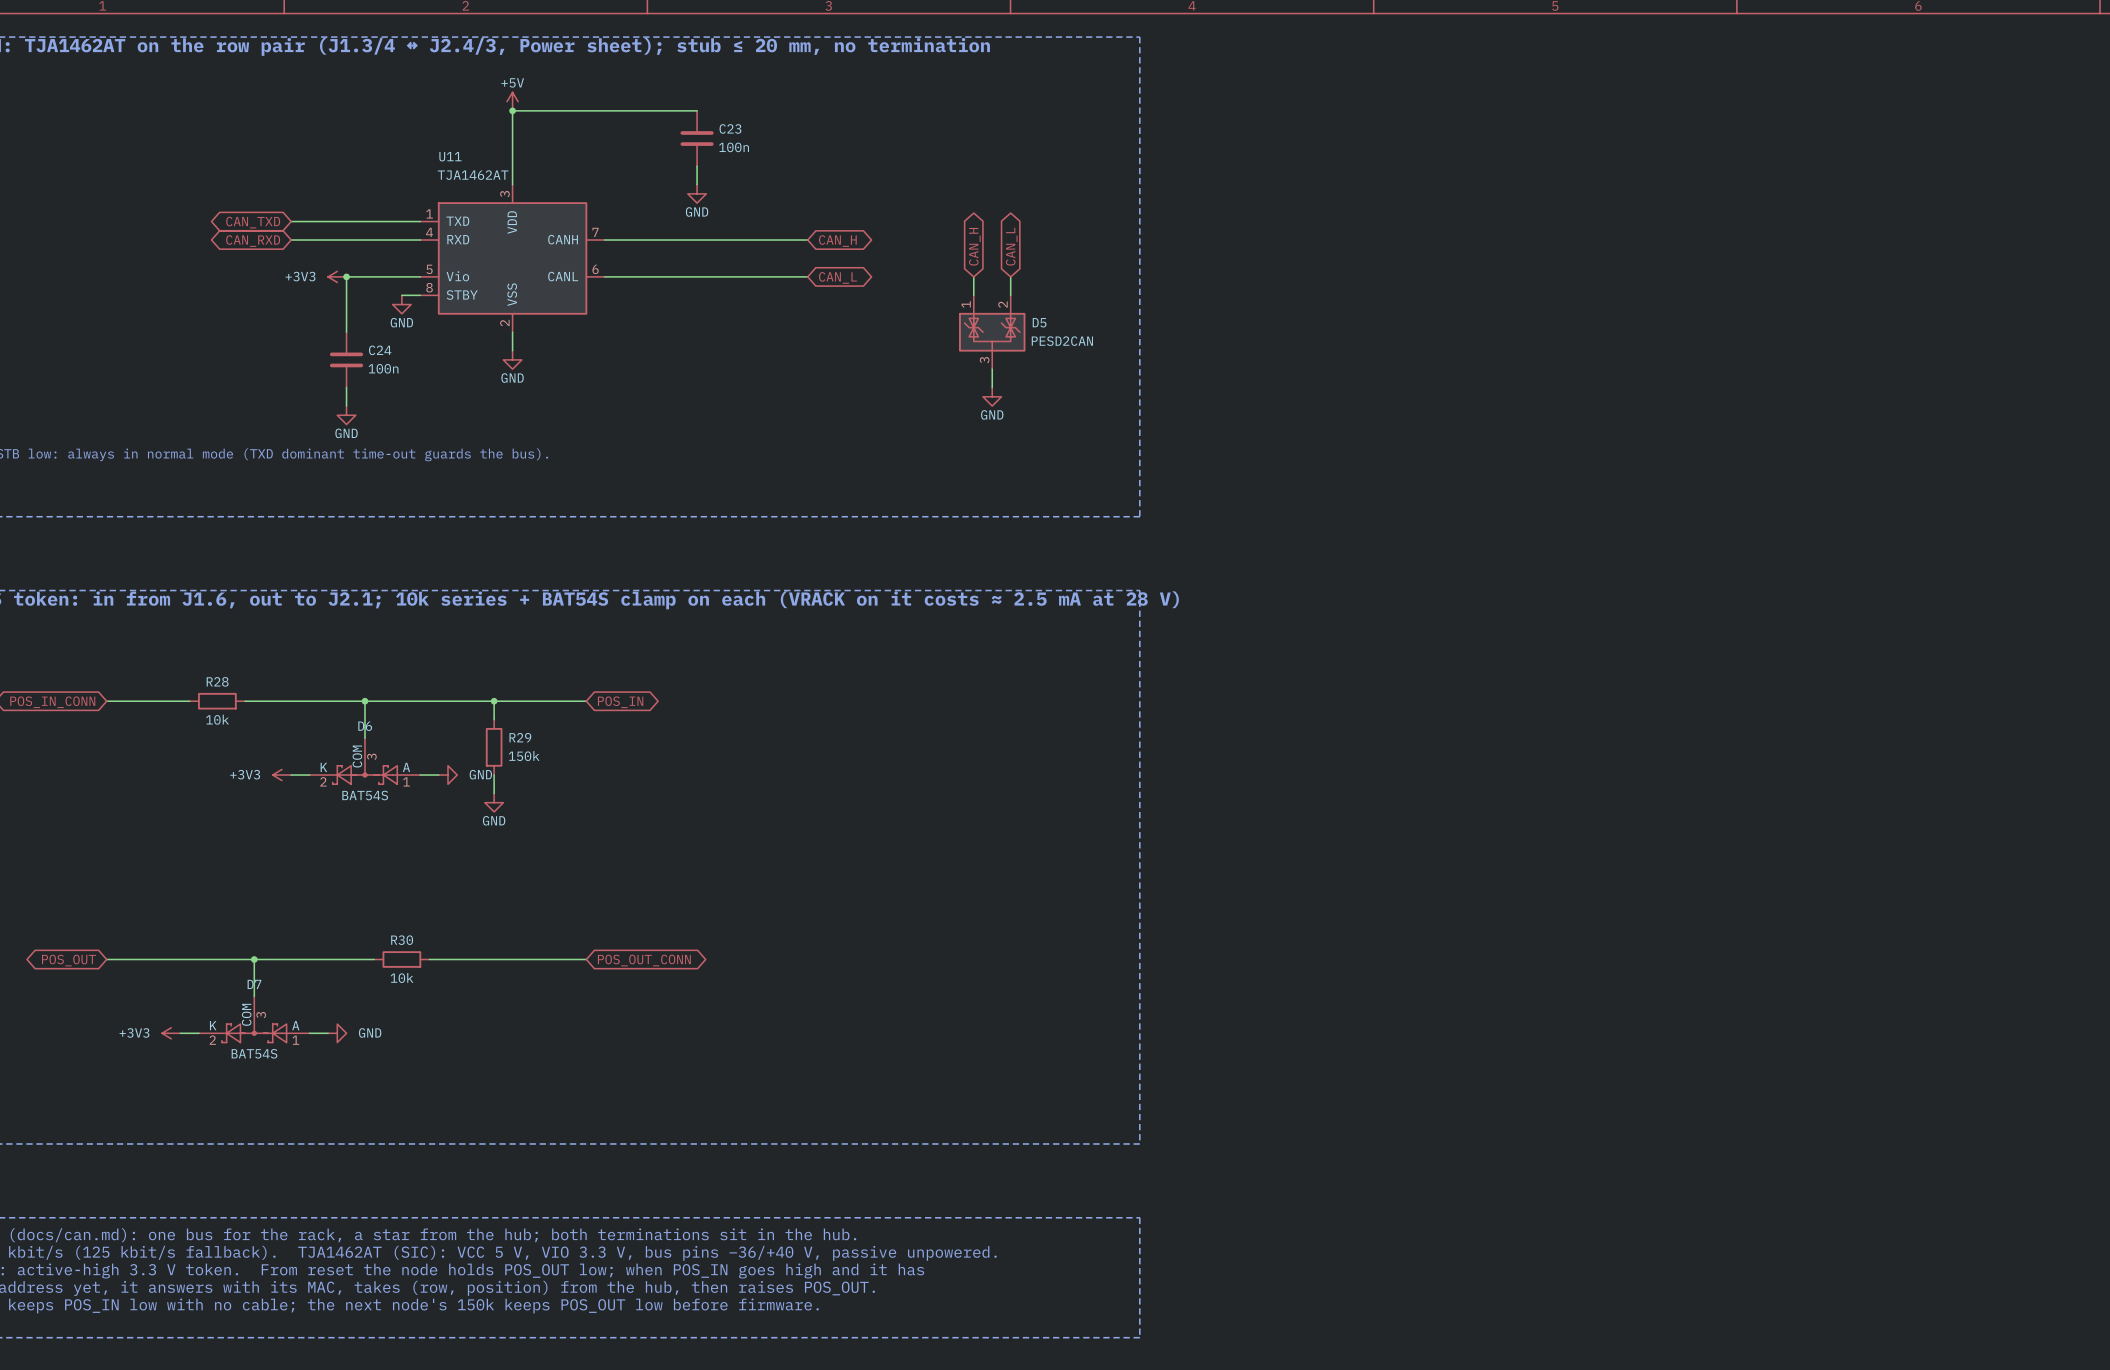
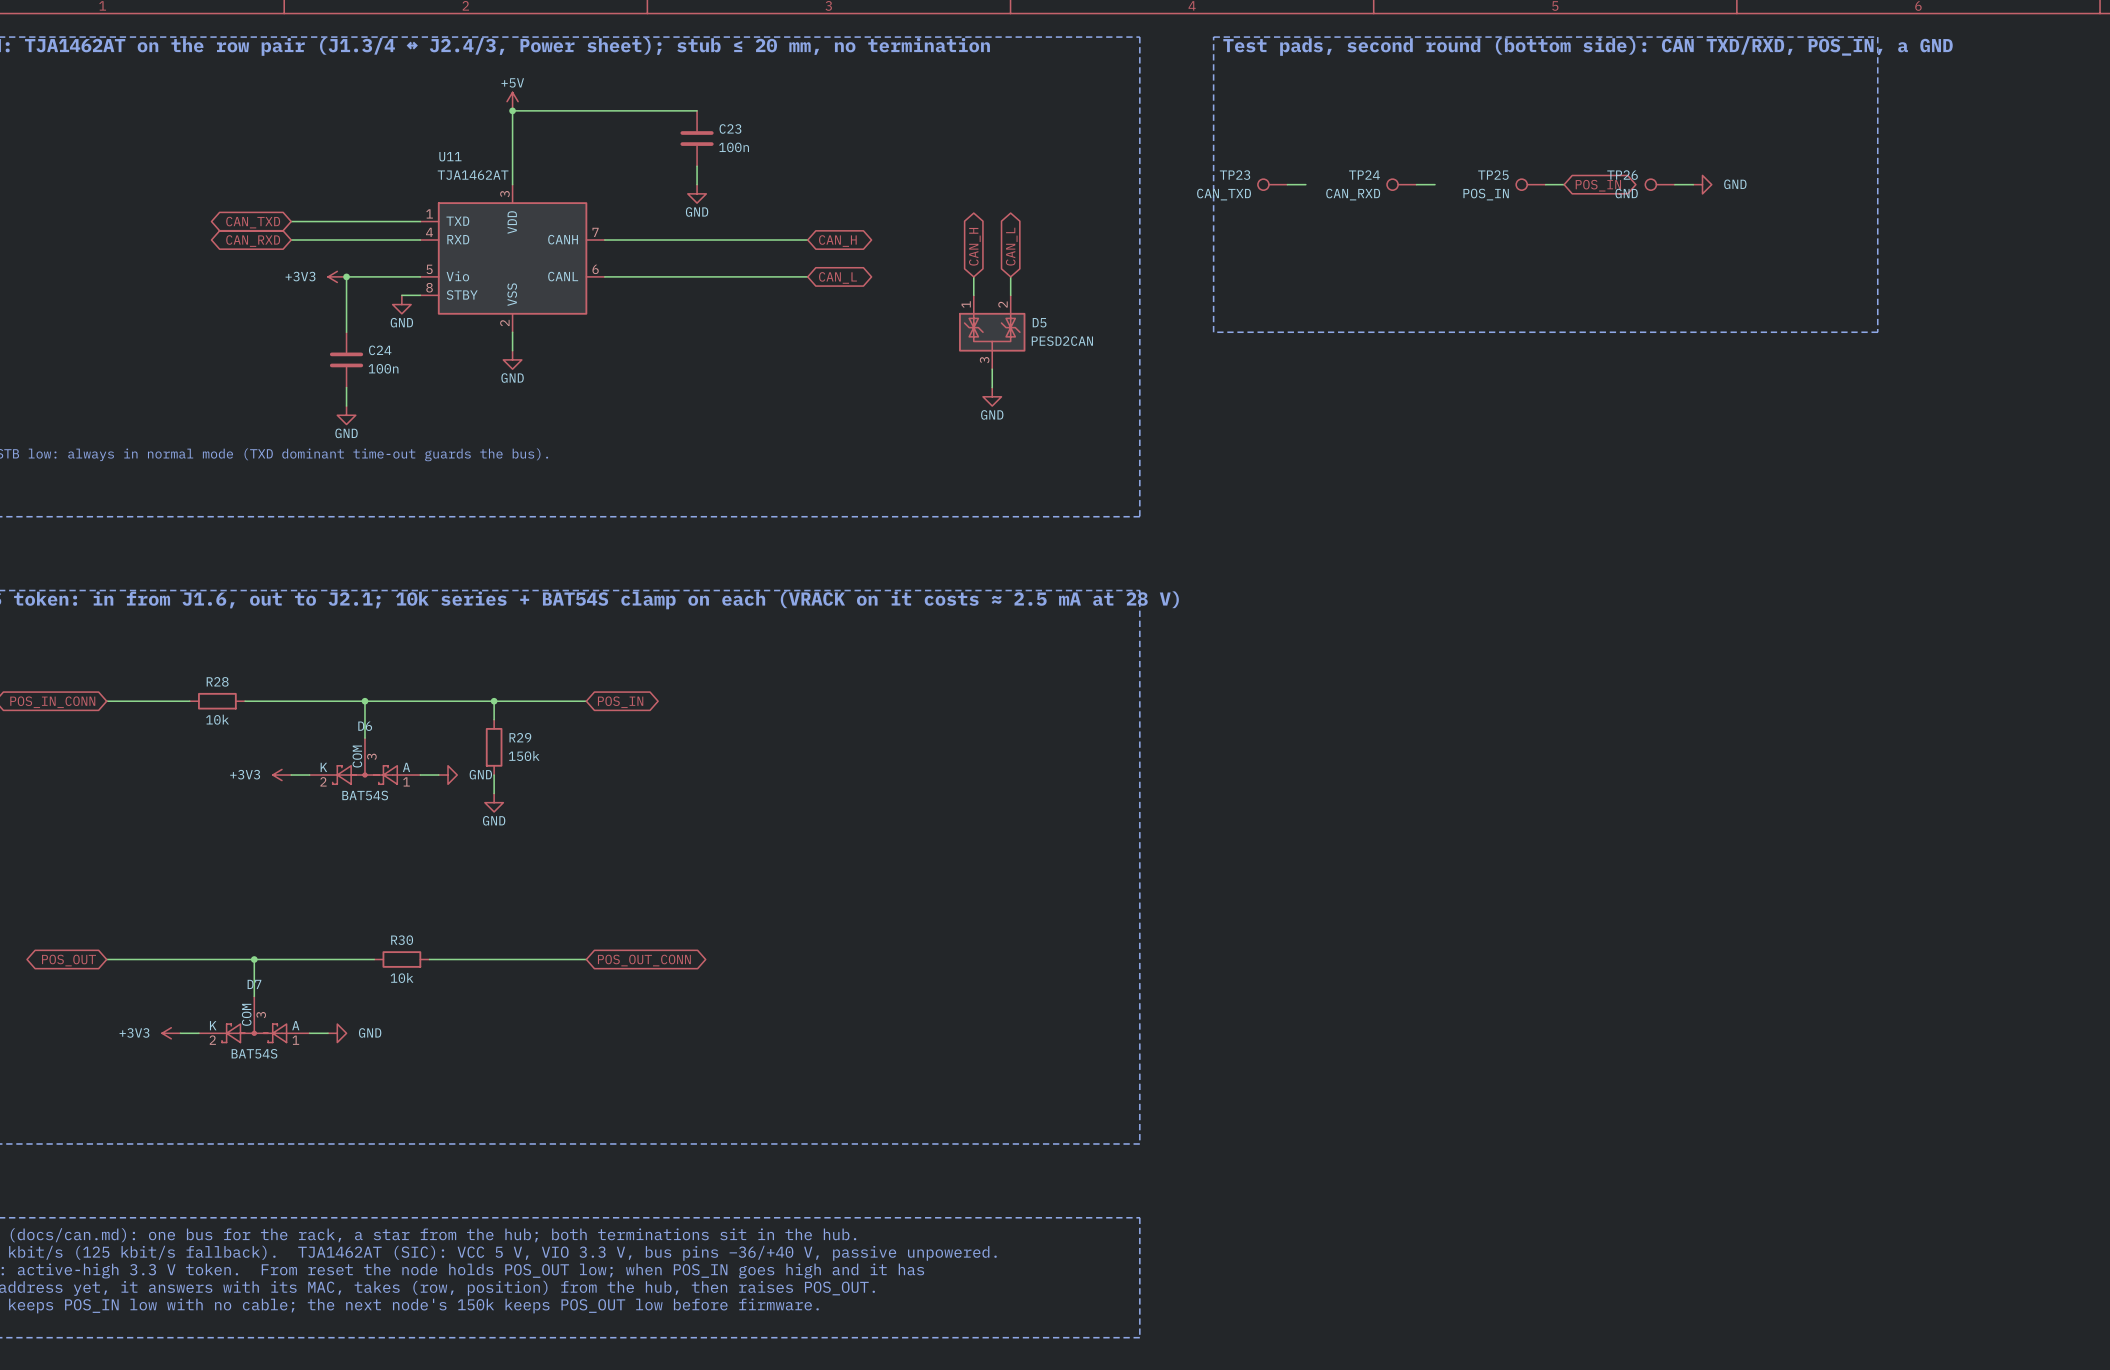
line: none -> (1213, 37) (1877, 37) (1877, 332) (1213, 332) (1213, 37)
text: none -> Test pads, second round (bottom side): CAN TXD/RXD, POS_IN, a GND (1588, 46)
TP23: none -> CAN_TXD (1272, 184)
wire: none -> (1287, 184) (1305, 184)
TP24: none -> CAN_RXD (1401, 184)
wire: none -> (1416, 184) (1435, 184)
TP25: none -> POS_IN (1530, 184)
wire: none -> (1545, 184) (1564, 184)
TP26: none -> GND (1660, 184)
wire: none -> (1674, 184) (1693, 184)
power symbol: none -> GND (1702, 184)
global label: none -> POS_IN (1598, 185)

